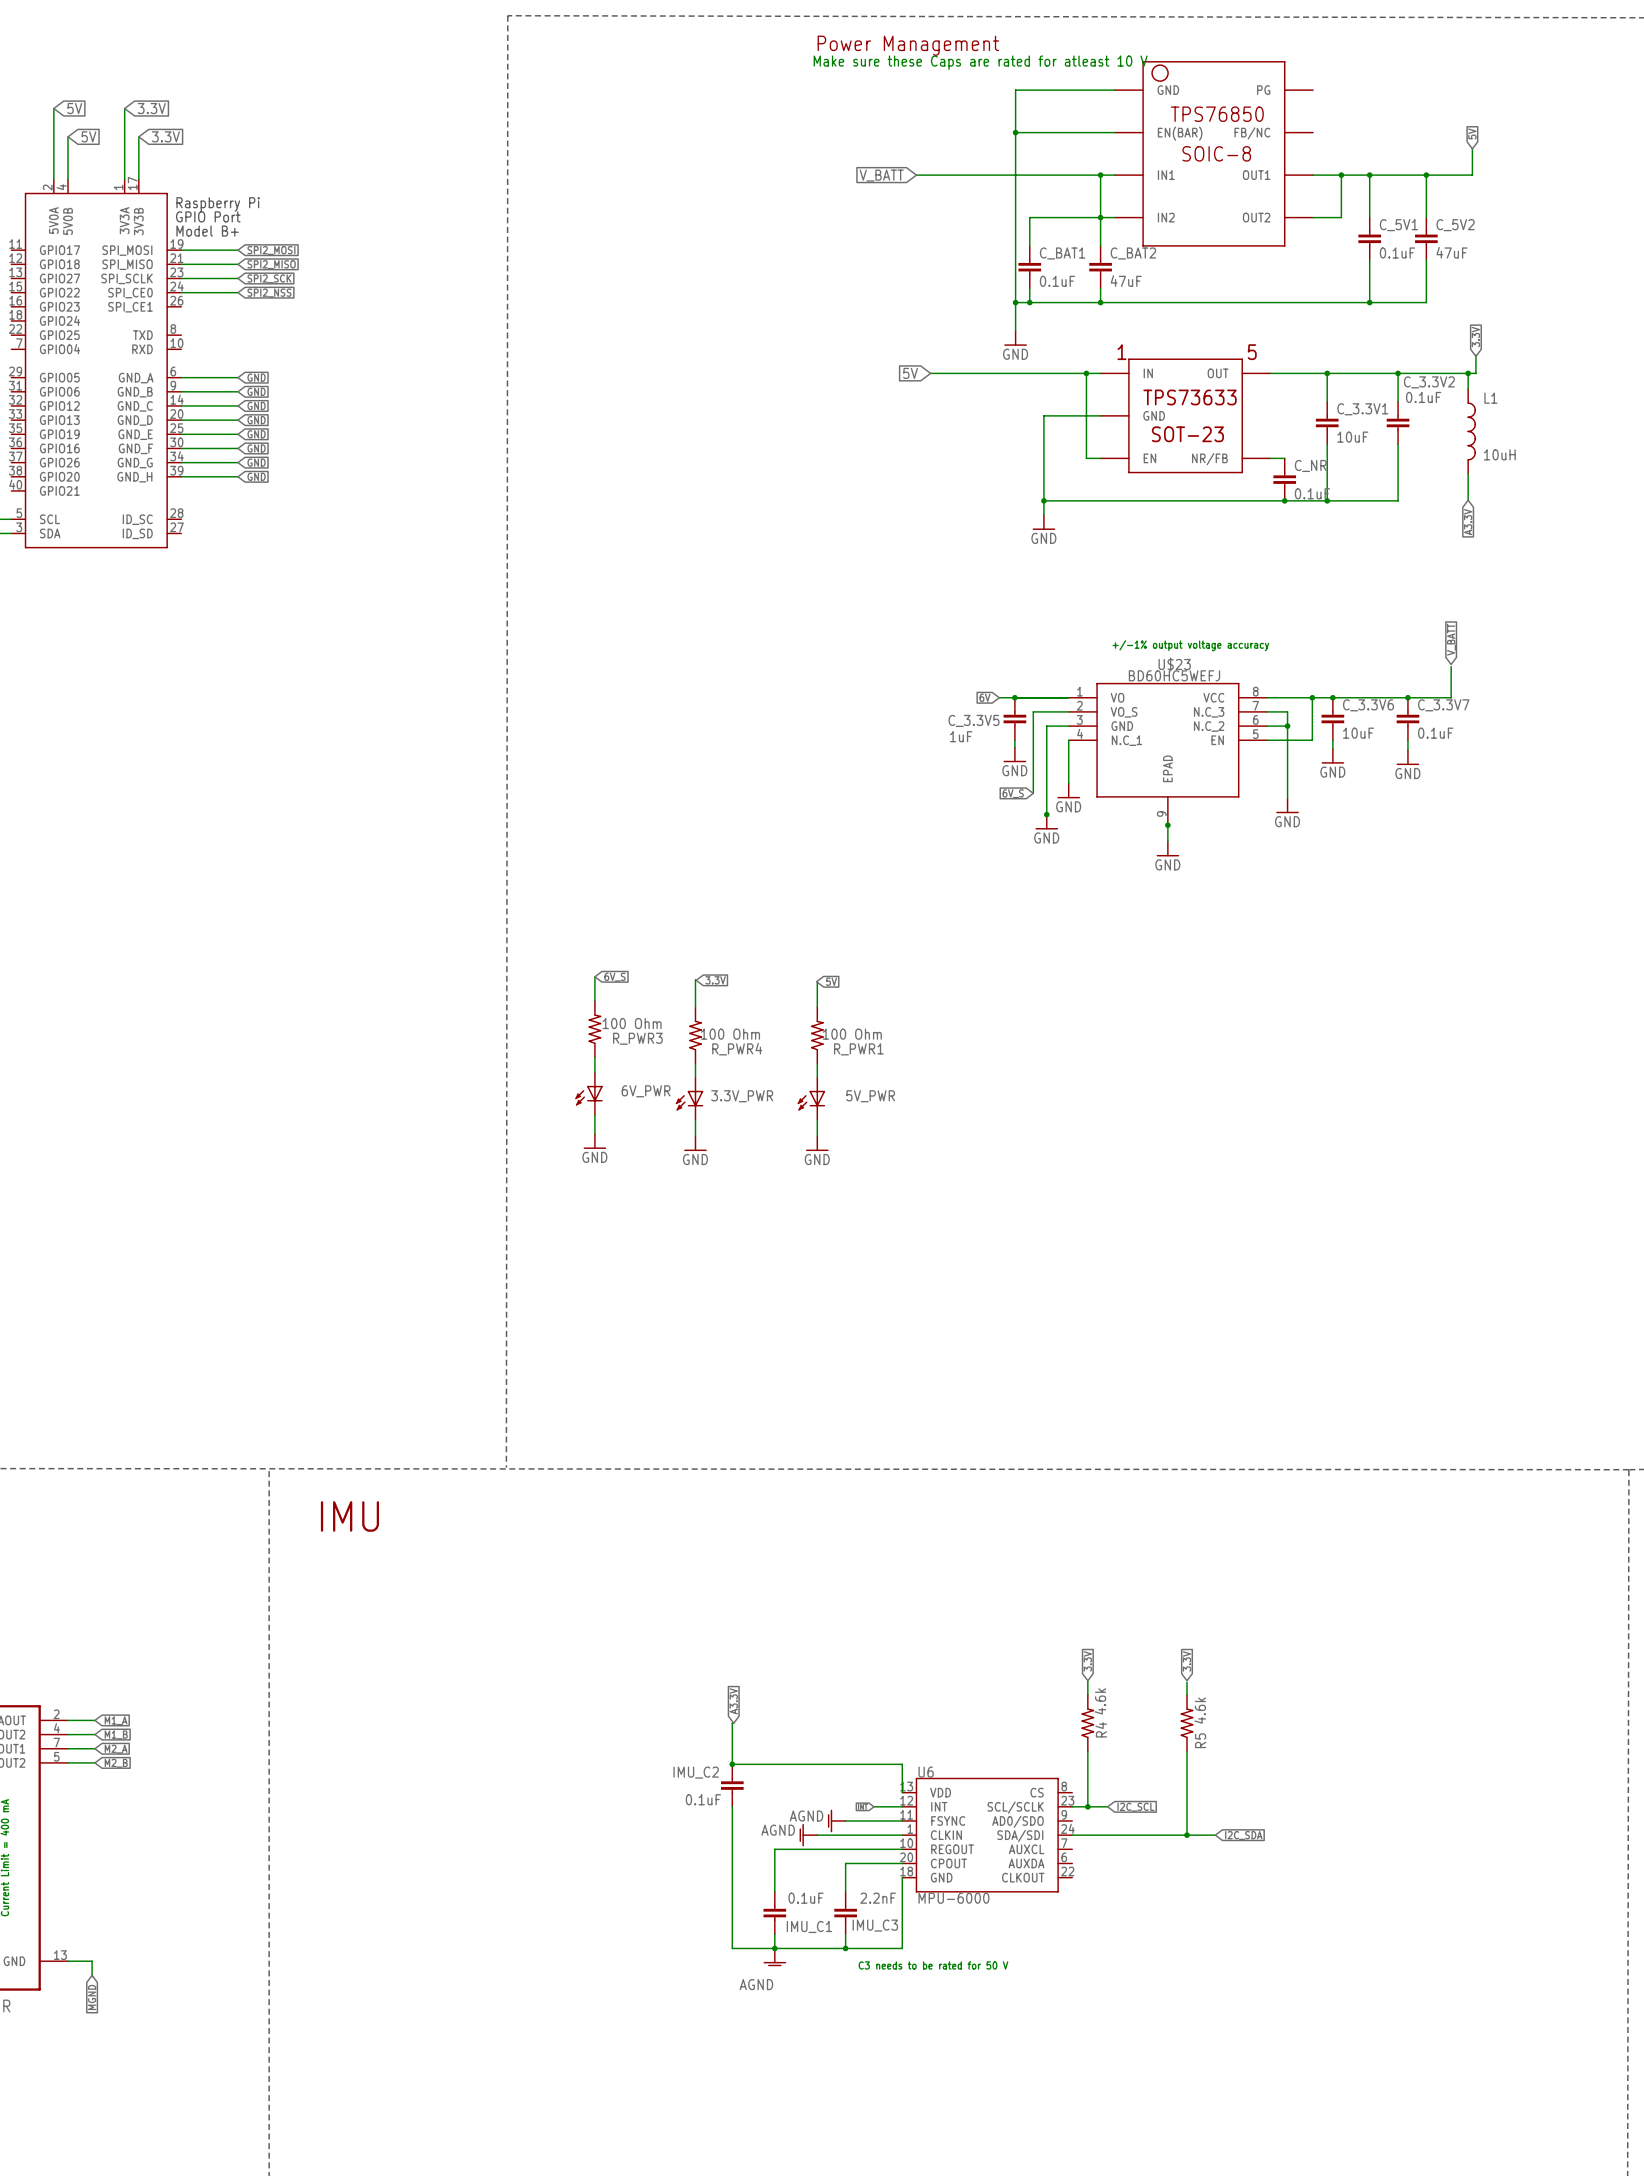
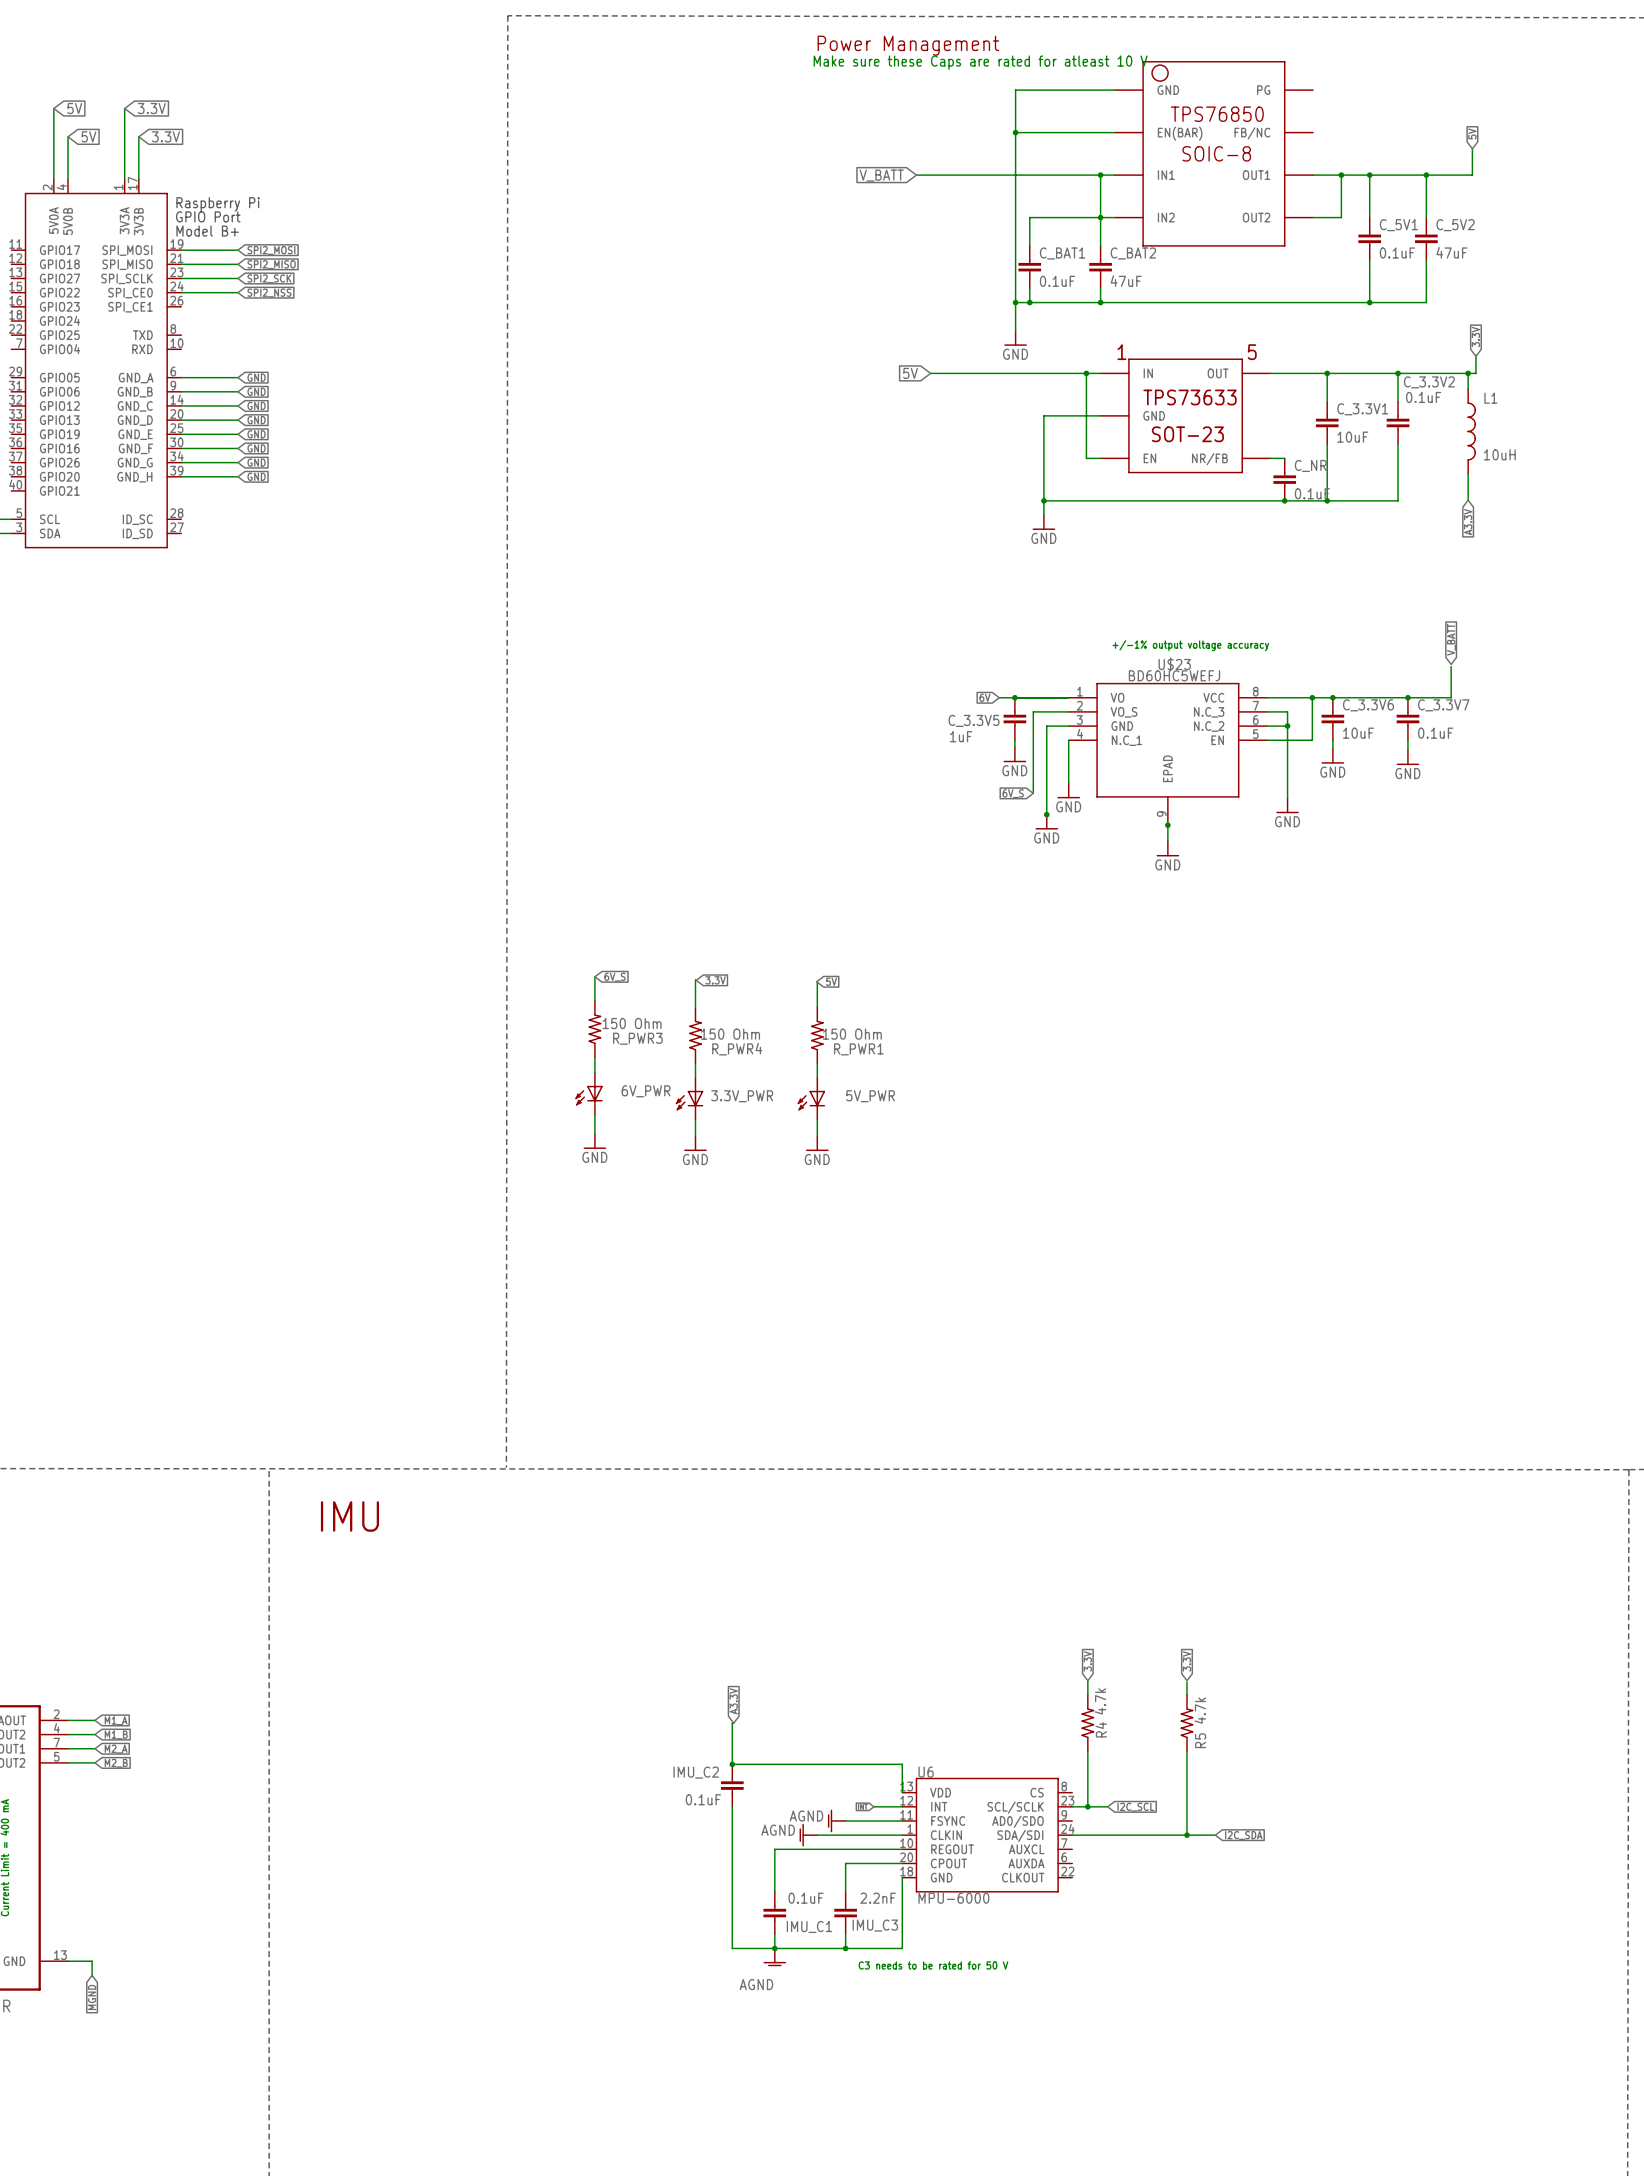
R_PWR3 value: 100 Ohm (632, 1023) -> 150 Ohm (632, 1023)
R_PWR4 value: 100 Ohm (730, 1034) -> 150 Ohm (730, 1034)
R_PWR1 value: 100 Ohm (852, 1034) -> 150 Ohm (852, 1034)
R4 value: 4.6k (1100, 1701) -> 4.7k (1100, 1701)
R5 value: 4.6k (1200, 1710) -> 4.7k (1200, 1710)

